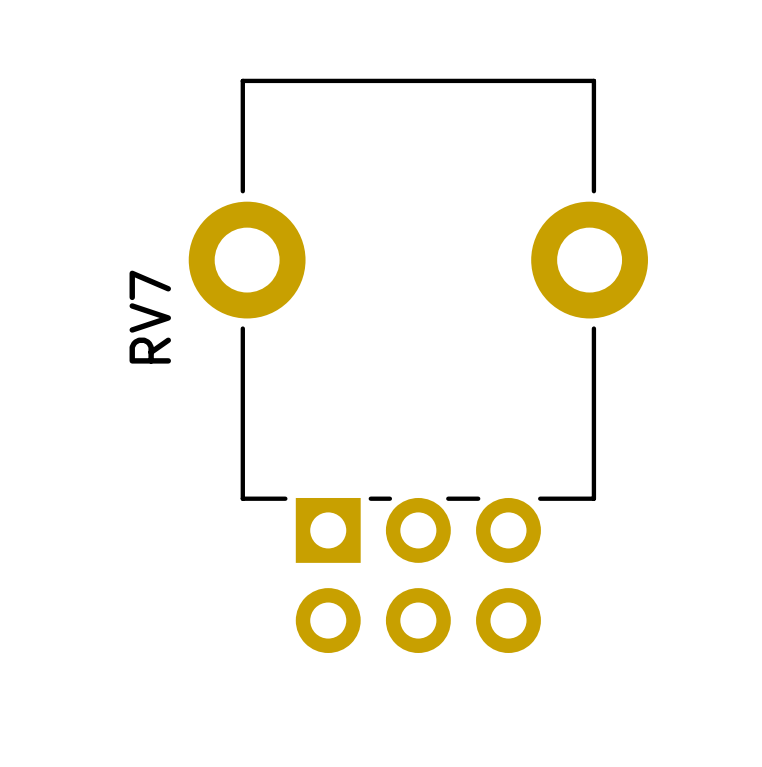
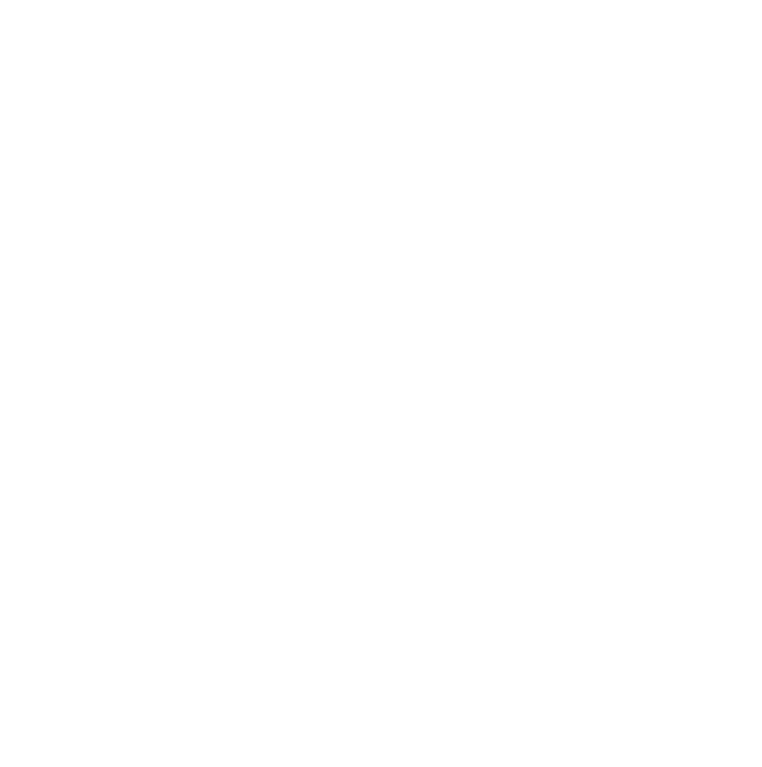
RV7: (418, 365) -> none

